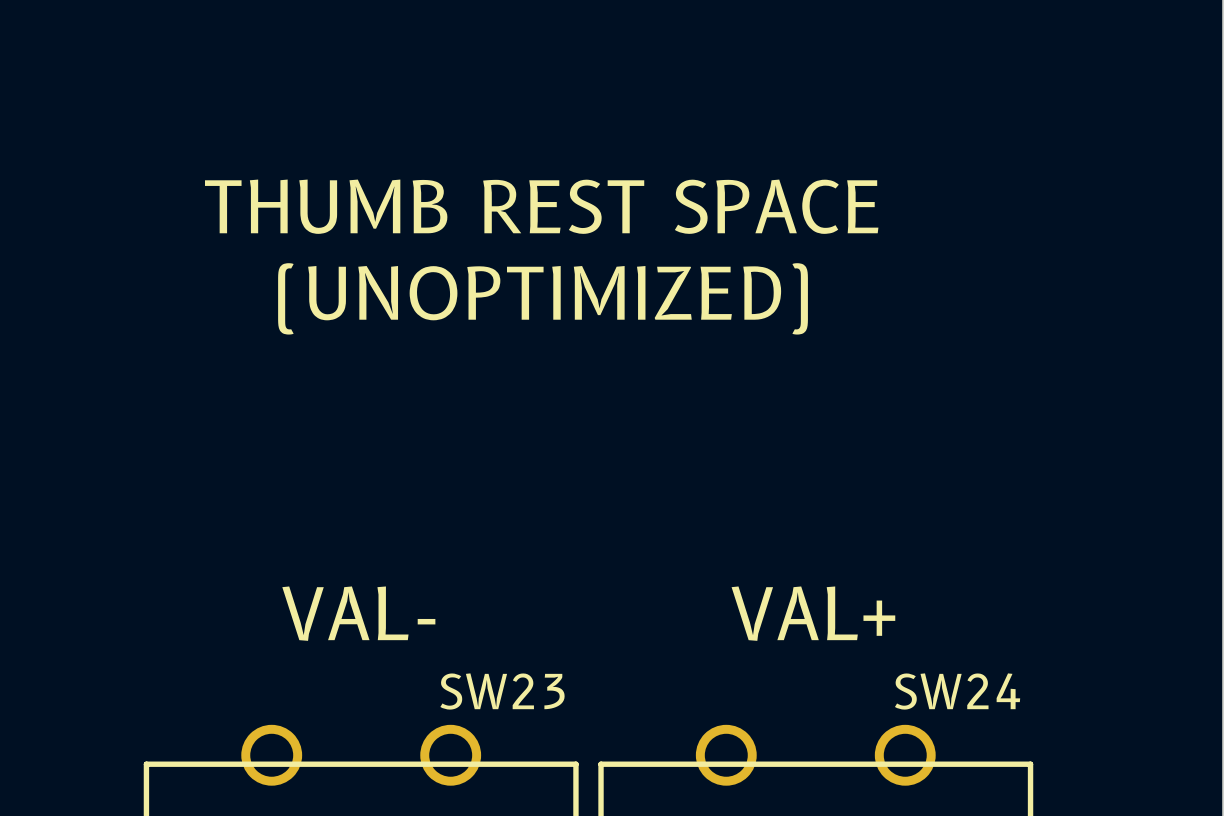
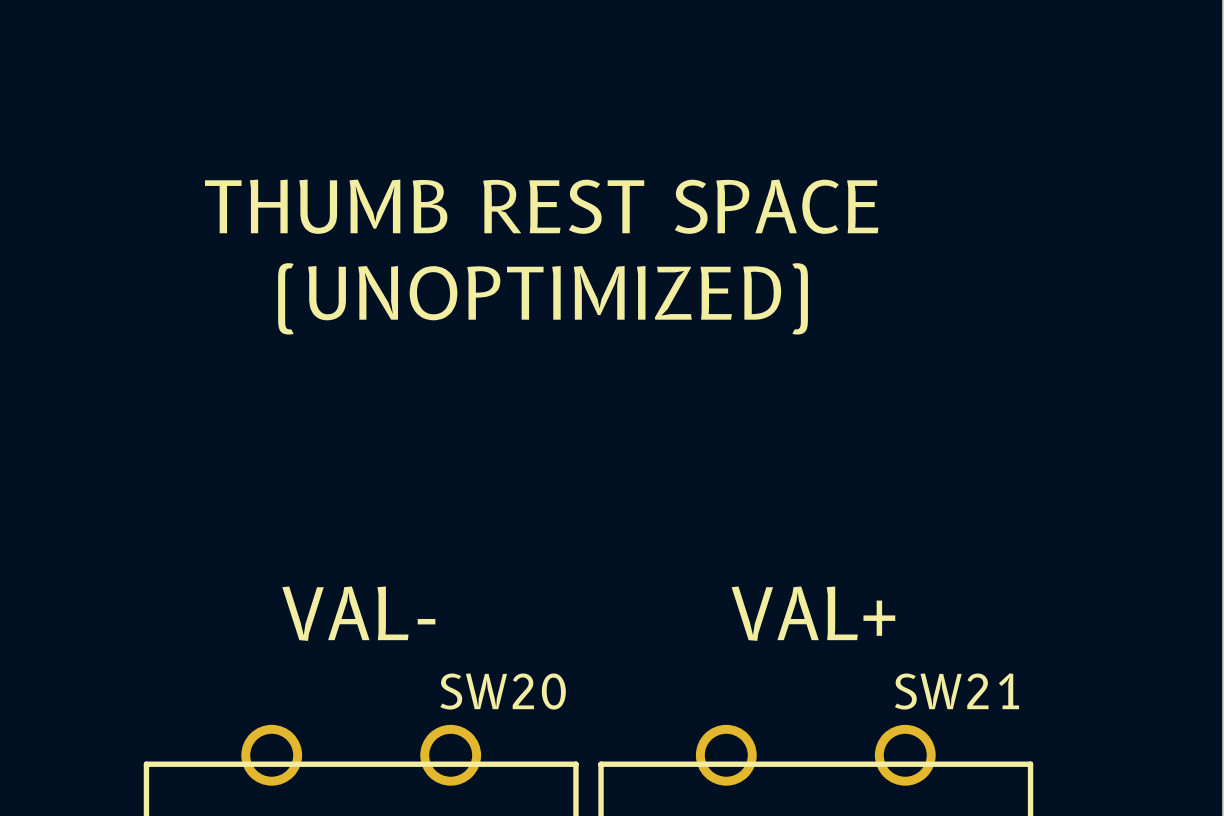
SW23 name: SW23 (502, 691) -> SW20 (503, 691)
SW24 name: SW24 (957, 691) -> SW21 (956, 691)

